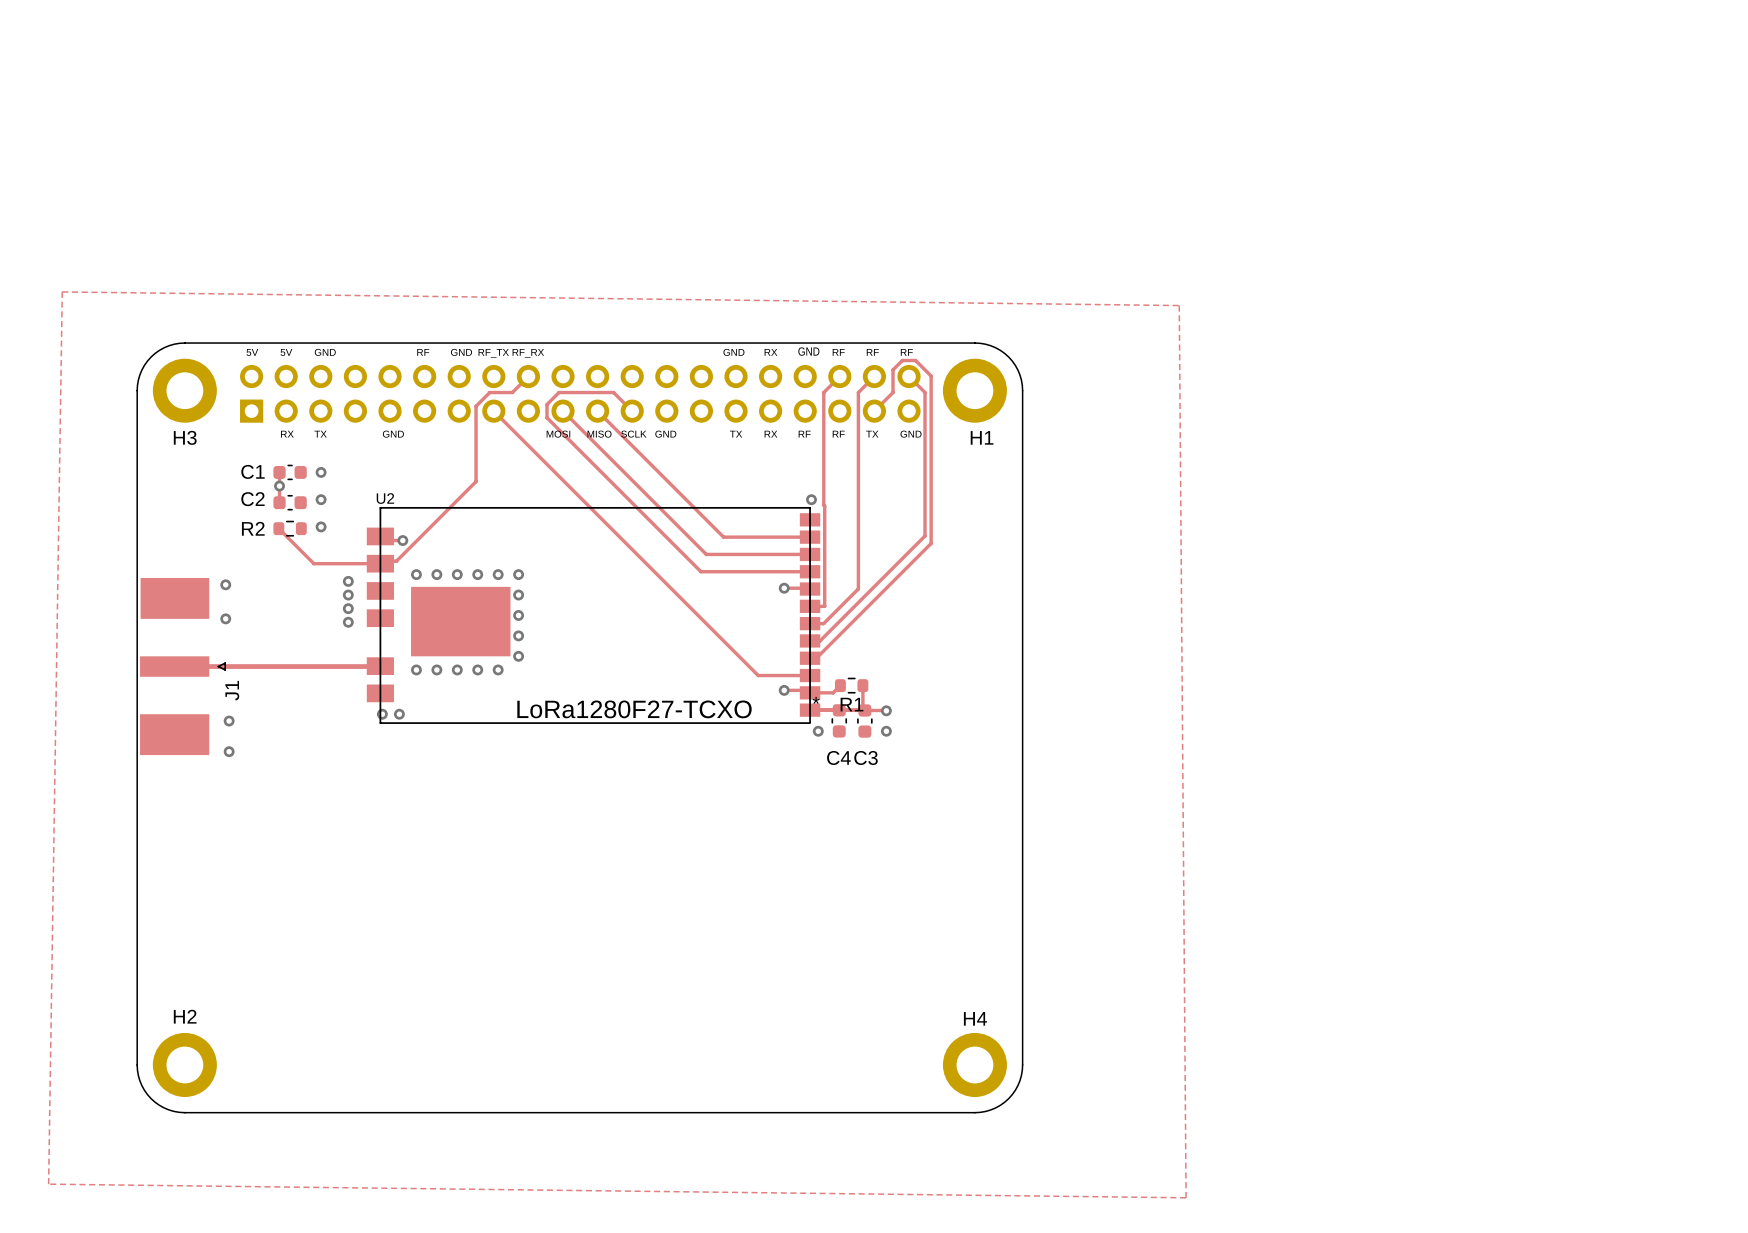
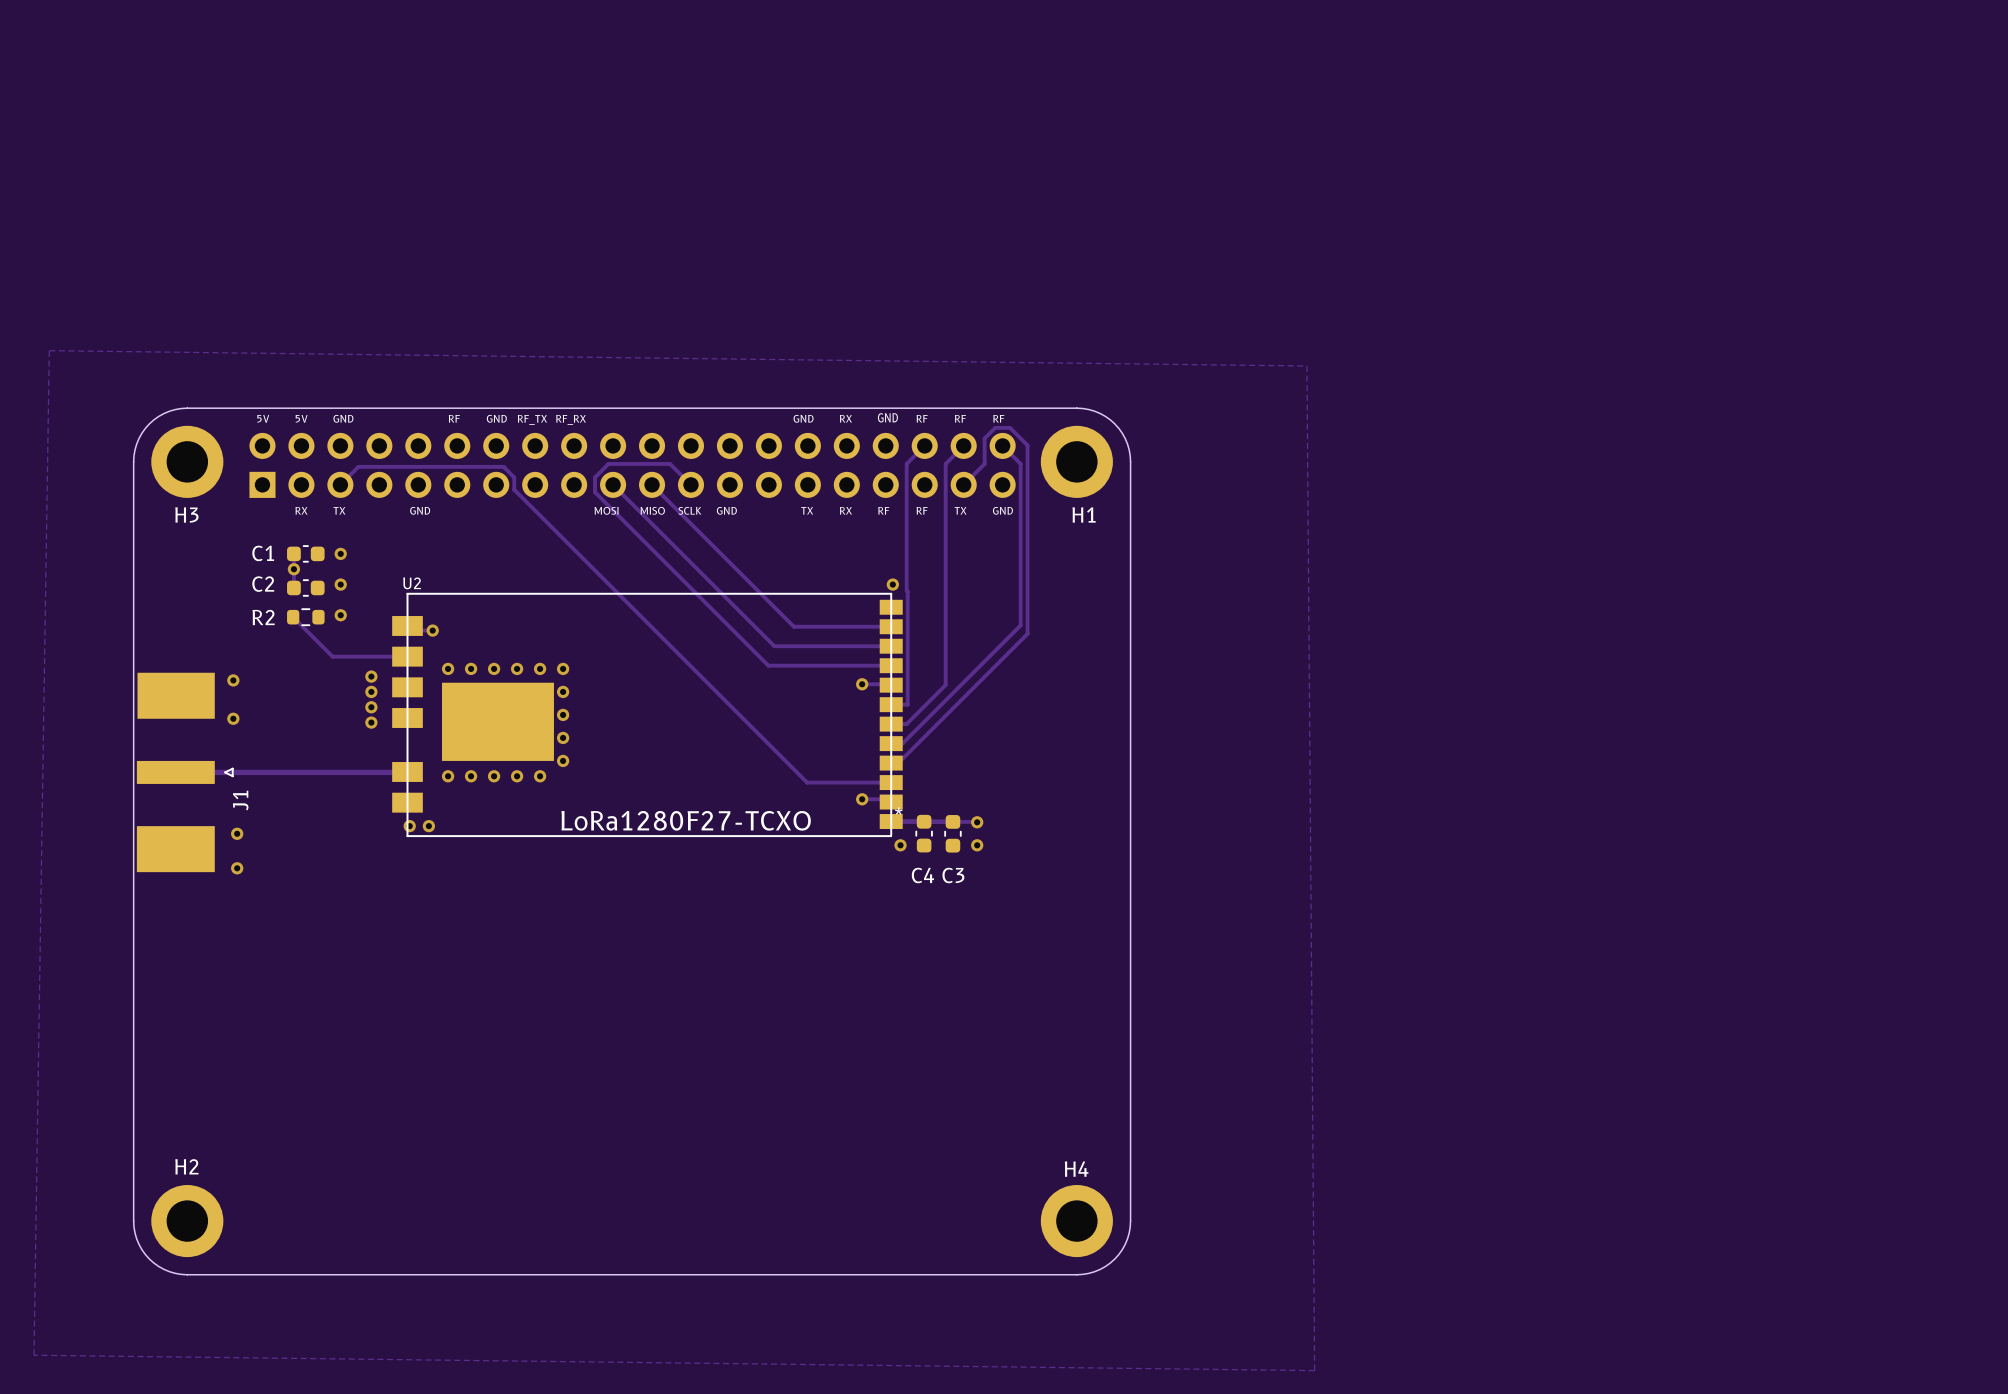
track: (528, 376) (512, 392) (489, 392) (476, 406) (476, 481) (396, 561) (386, 561) (384, 559) -> none
track: (493, 411) (758, 675) -> (340, 484) (358, 466) (503, 466) (514, 477) (514, 489) (807, 782) (832, 782)
track: (840, 685) (833, 692) (810, 692) -> none
R1: (851, 685) -> none
track: (862, 685) (862, 708) (864, 710) -> none

